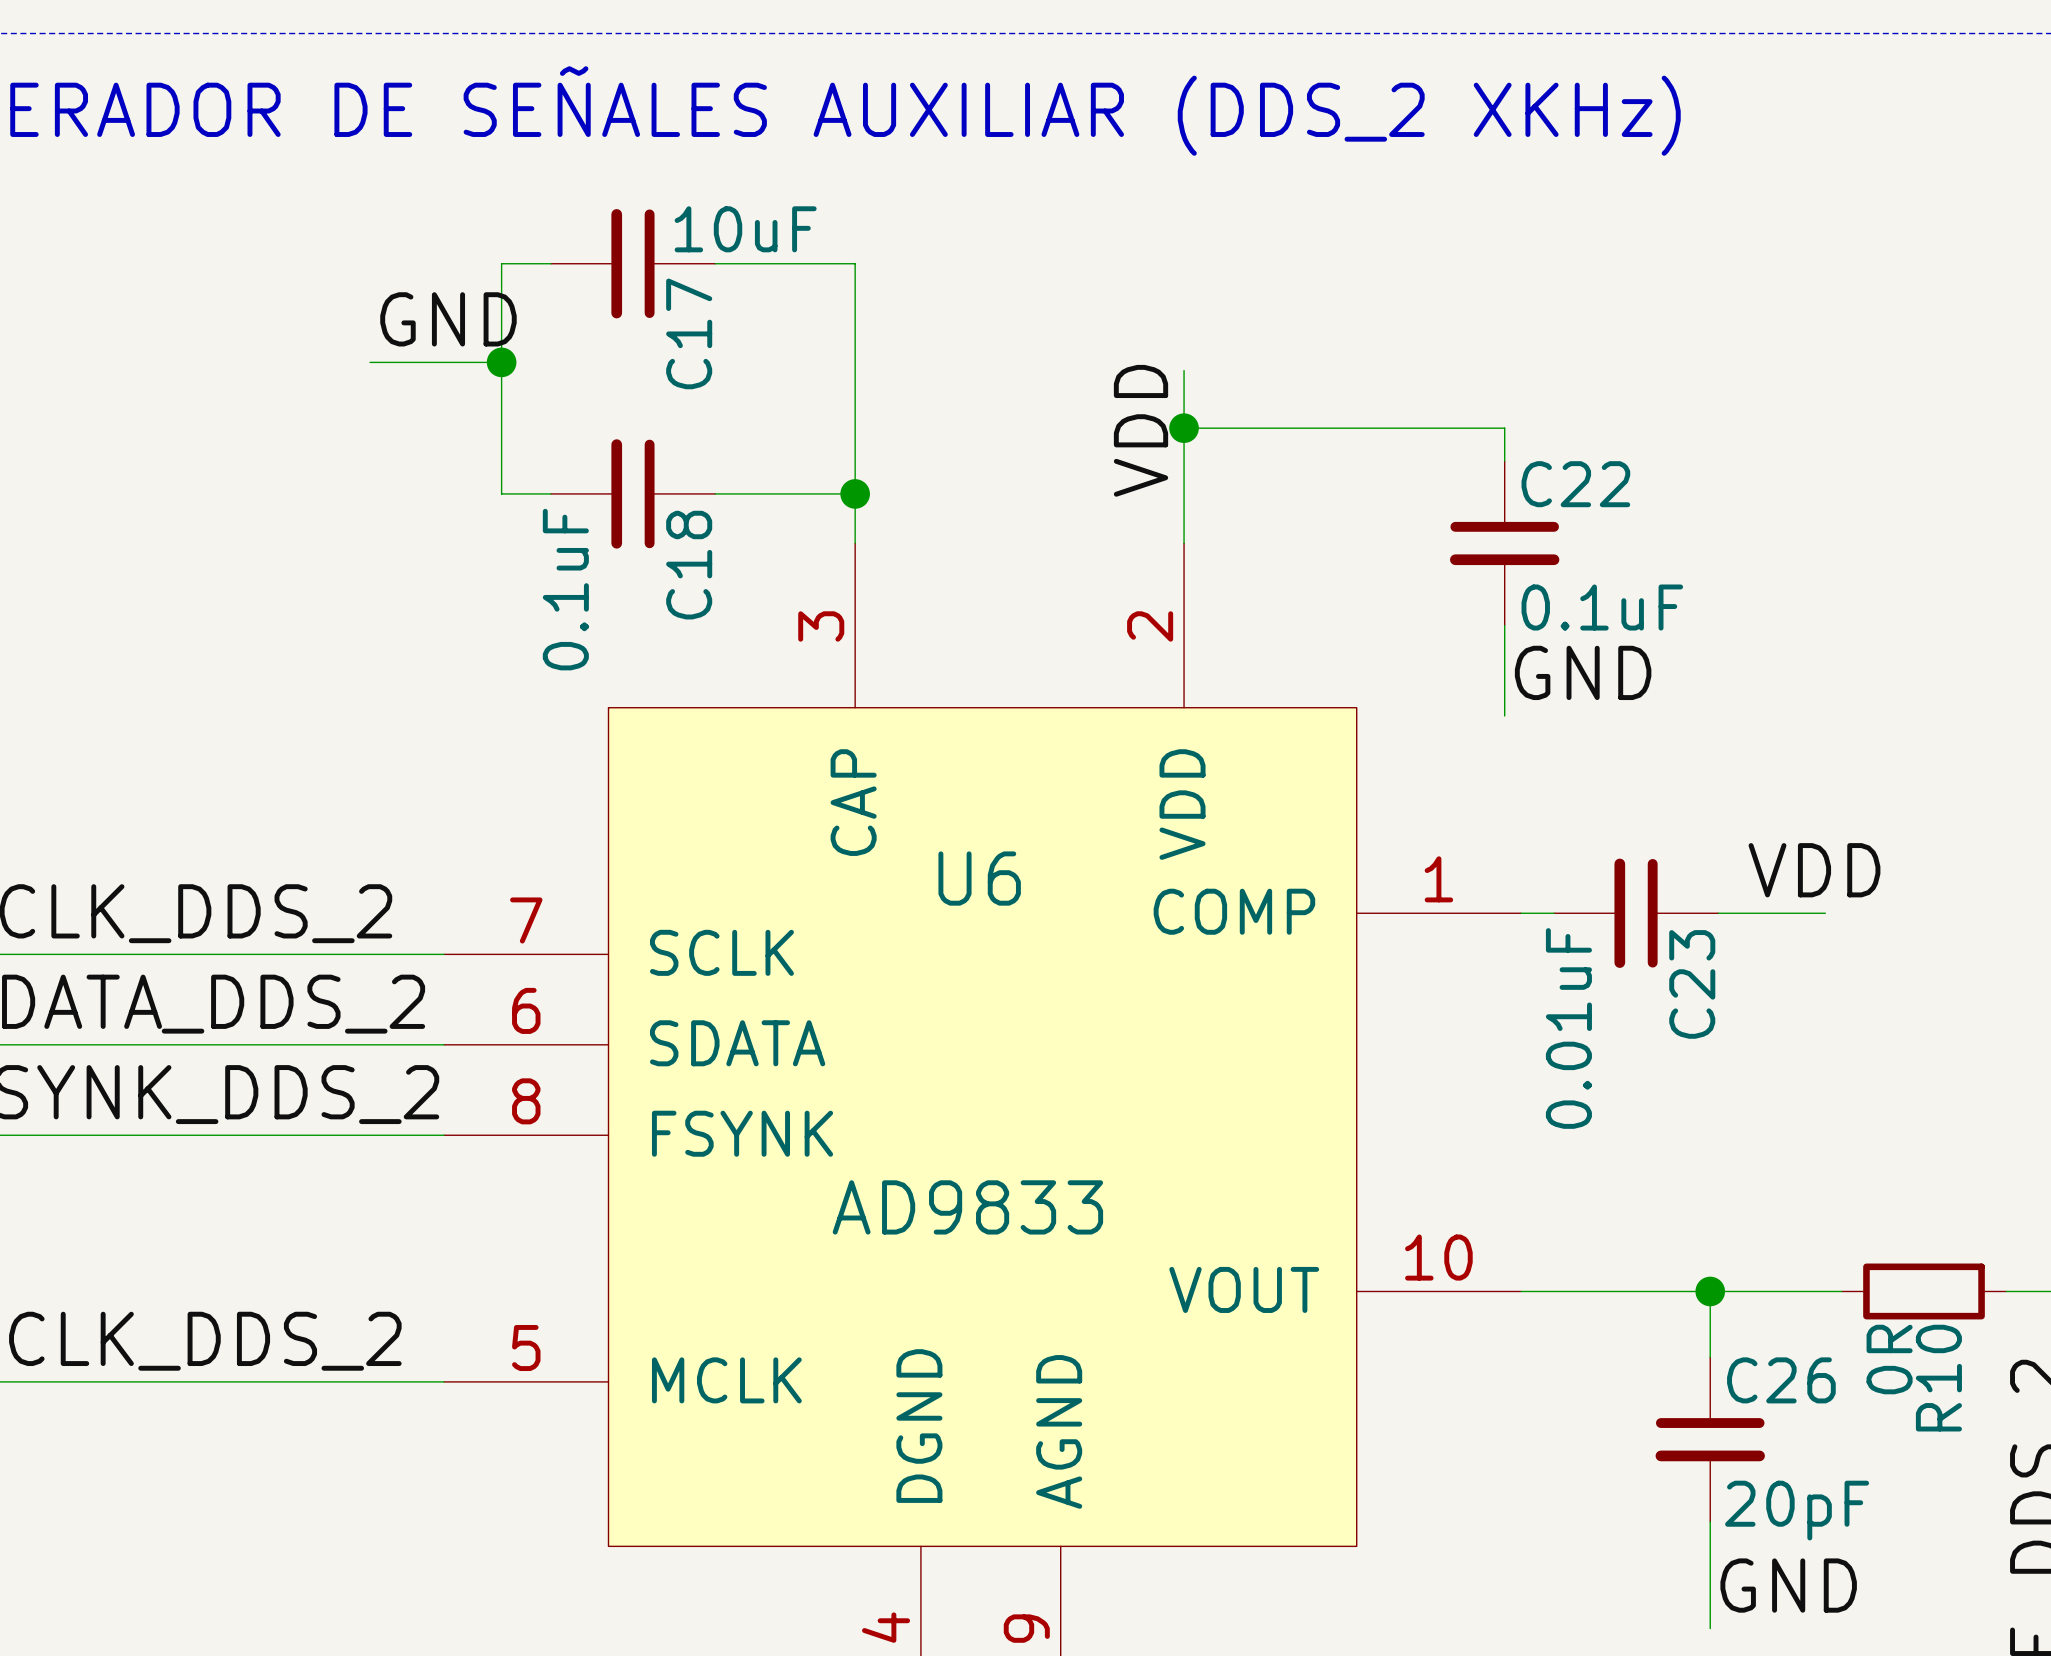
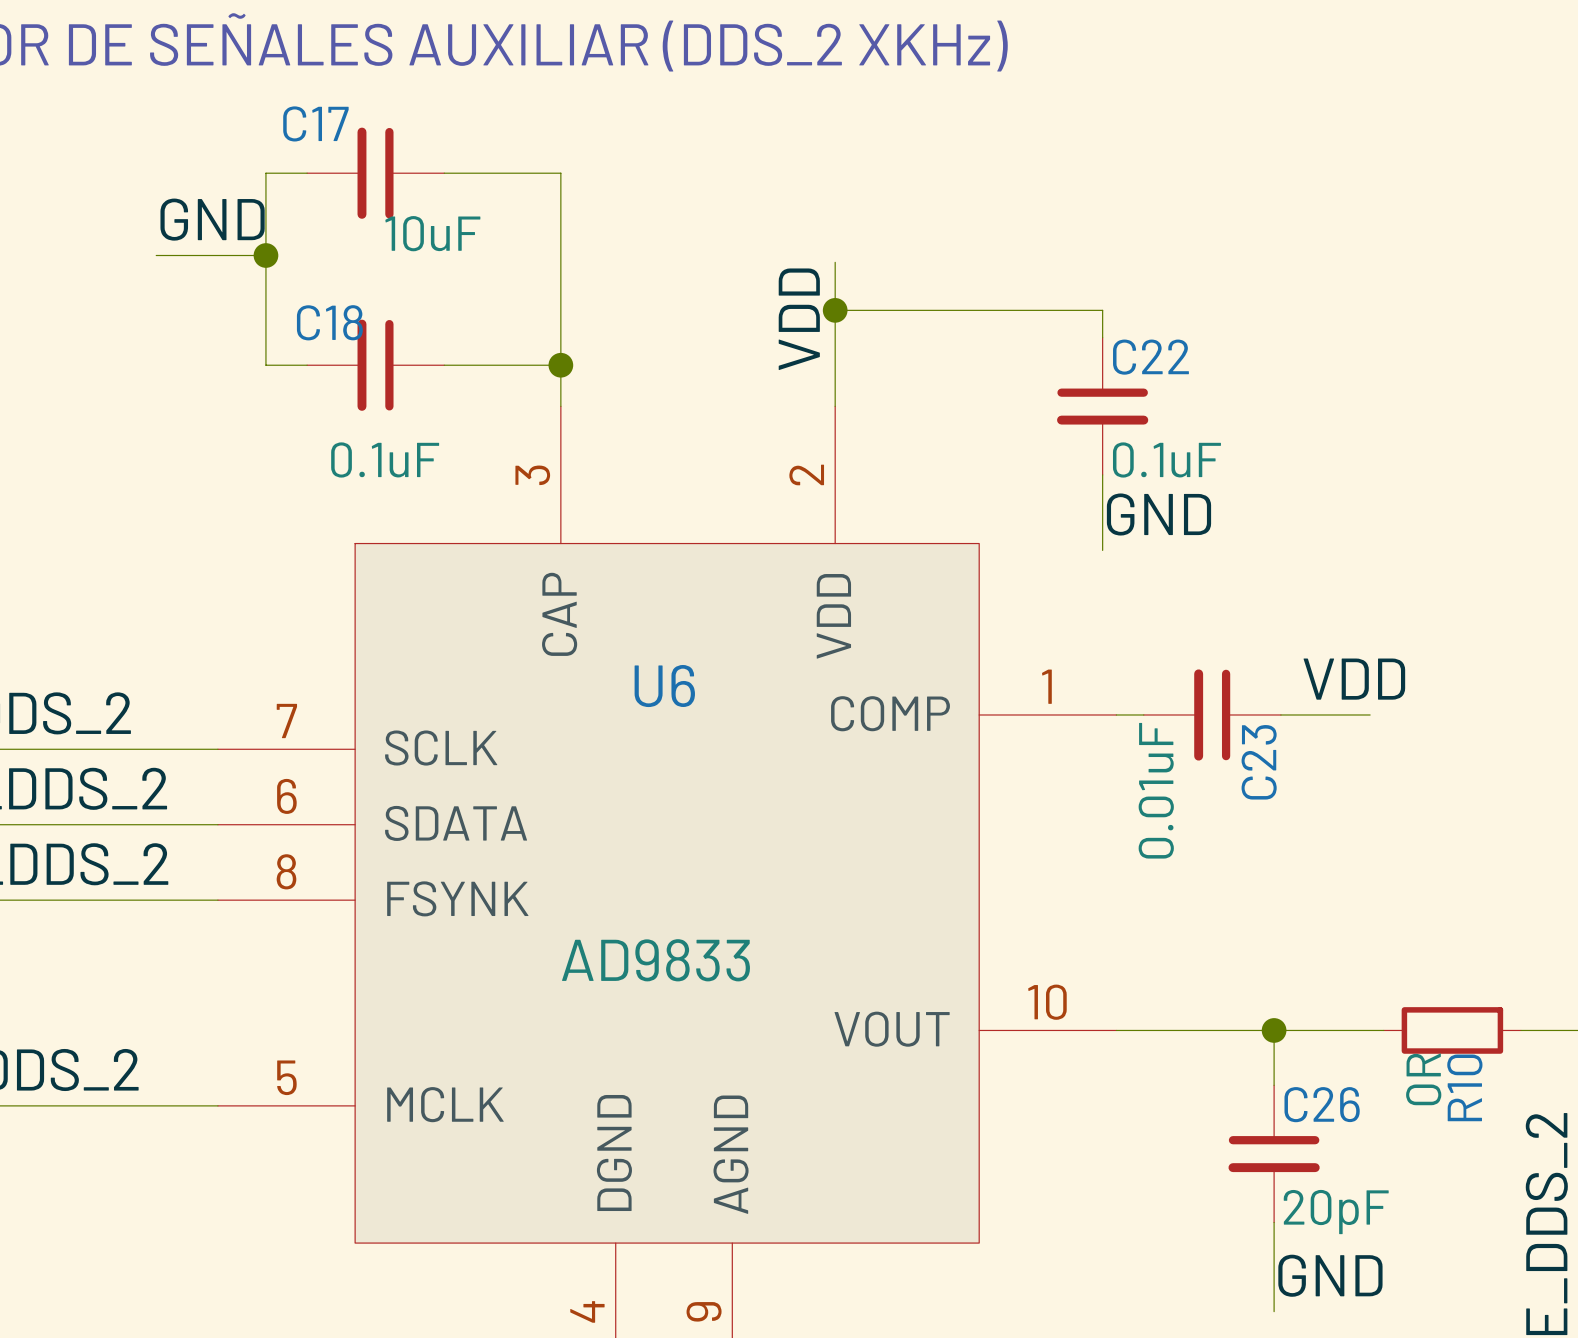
C17 value position: 10uF (745, 229) -> 10uF (432, 233)
C17 name rotation: 0° (689, 333) -> 90° clockwise (315, 123)
C17 name position: C17 (689, 333) -> C17 (315, 123)
C18 name rotation: 0° (689, 565) -> 90° clockwise (329, 322)
C18 name position: C18 (689, 565) -> C18 (329, 322)
C18 value rotation: 0° (565, 589) -> 90° clockwise (385, 459)

